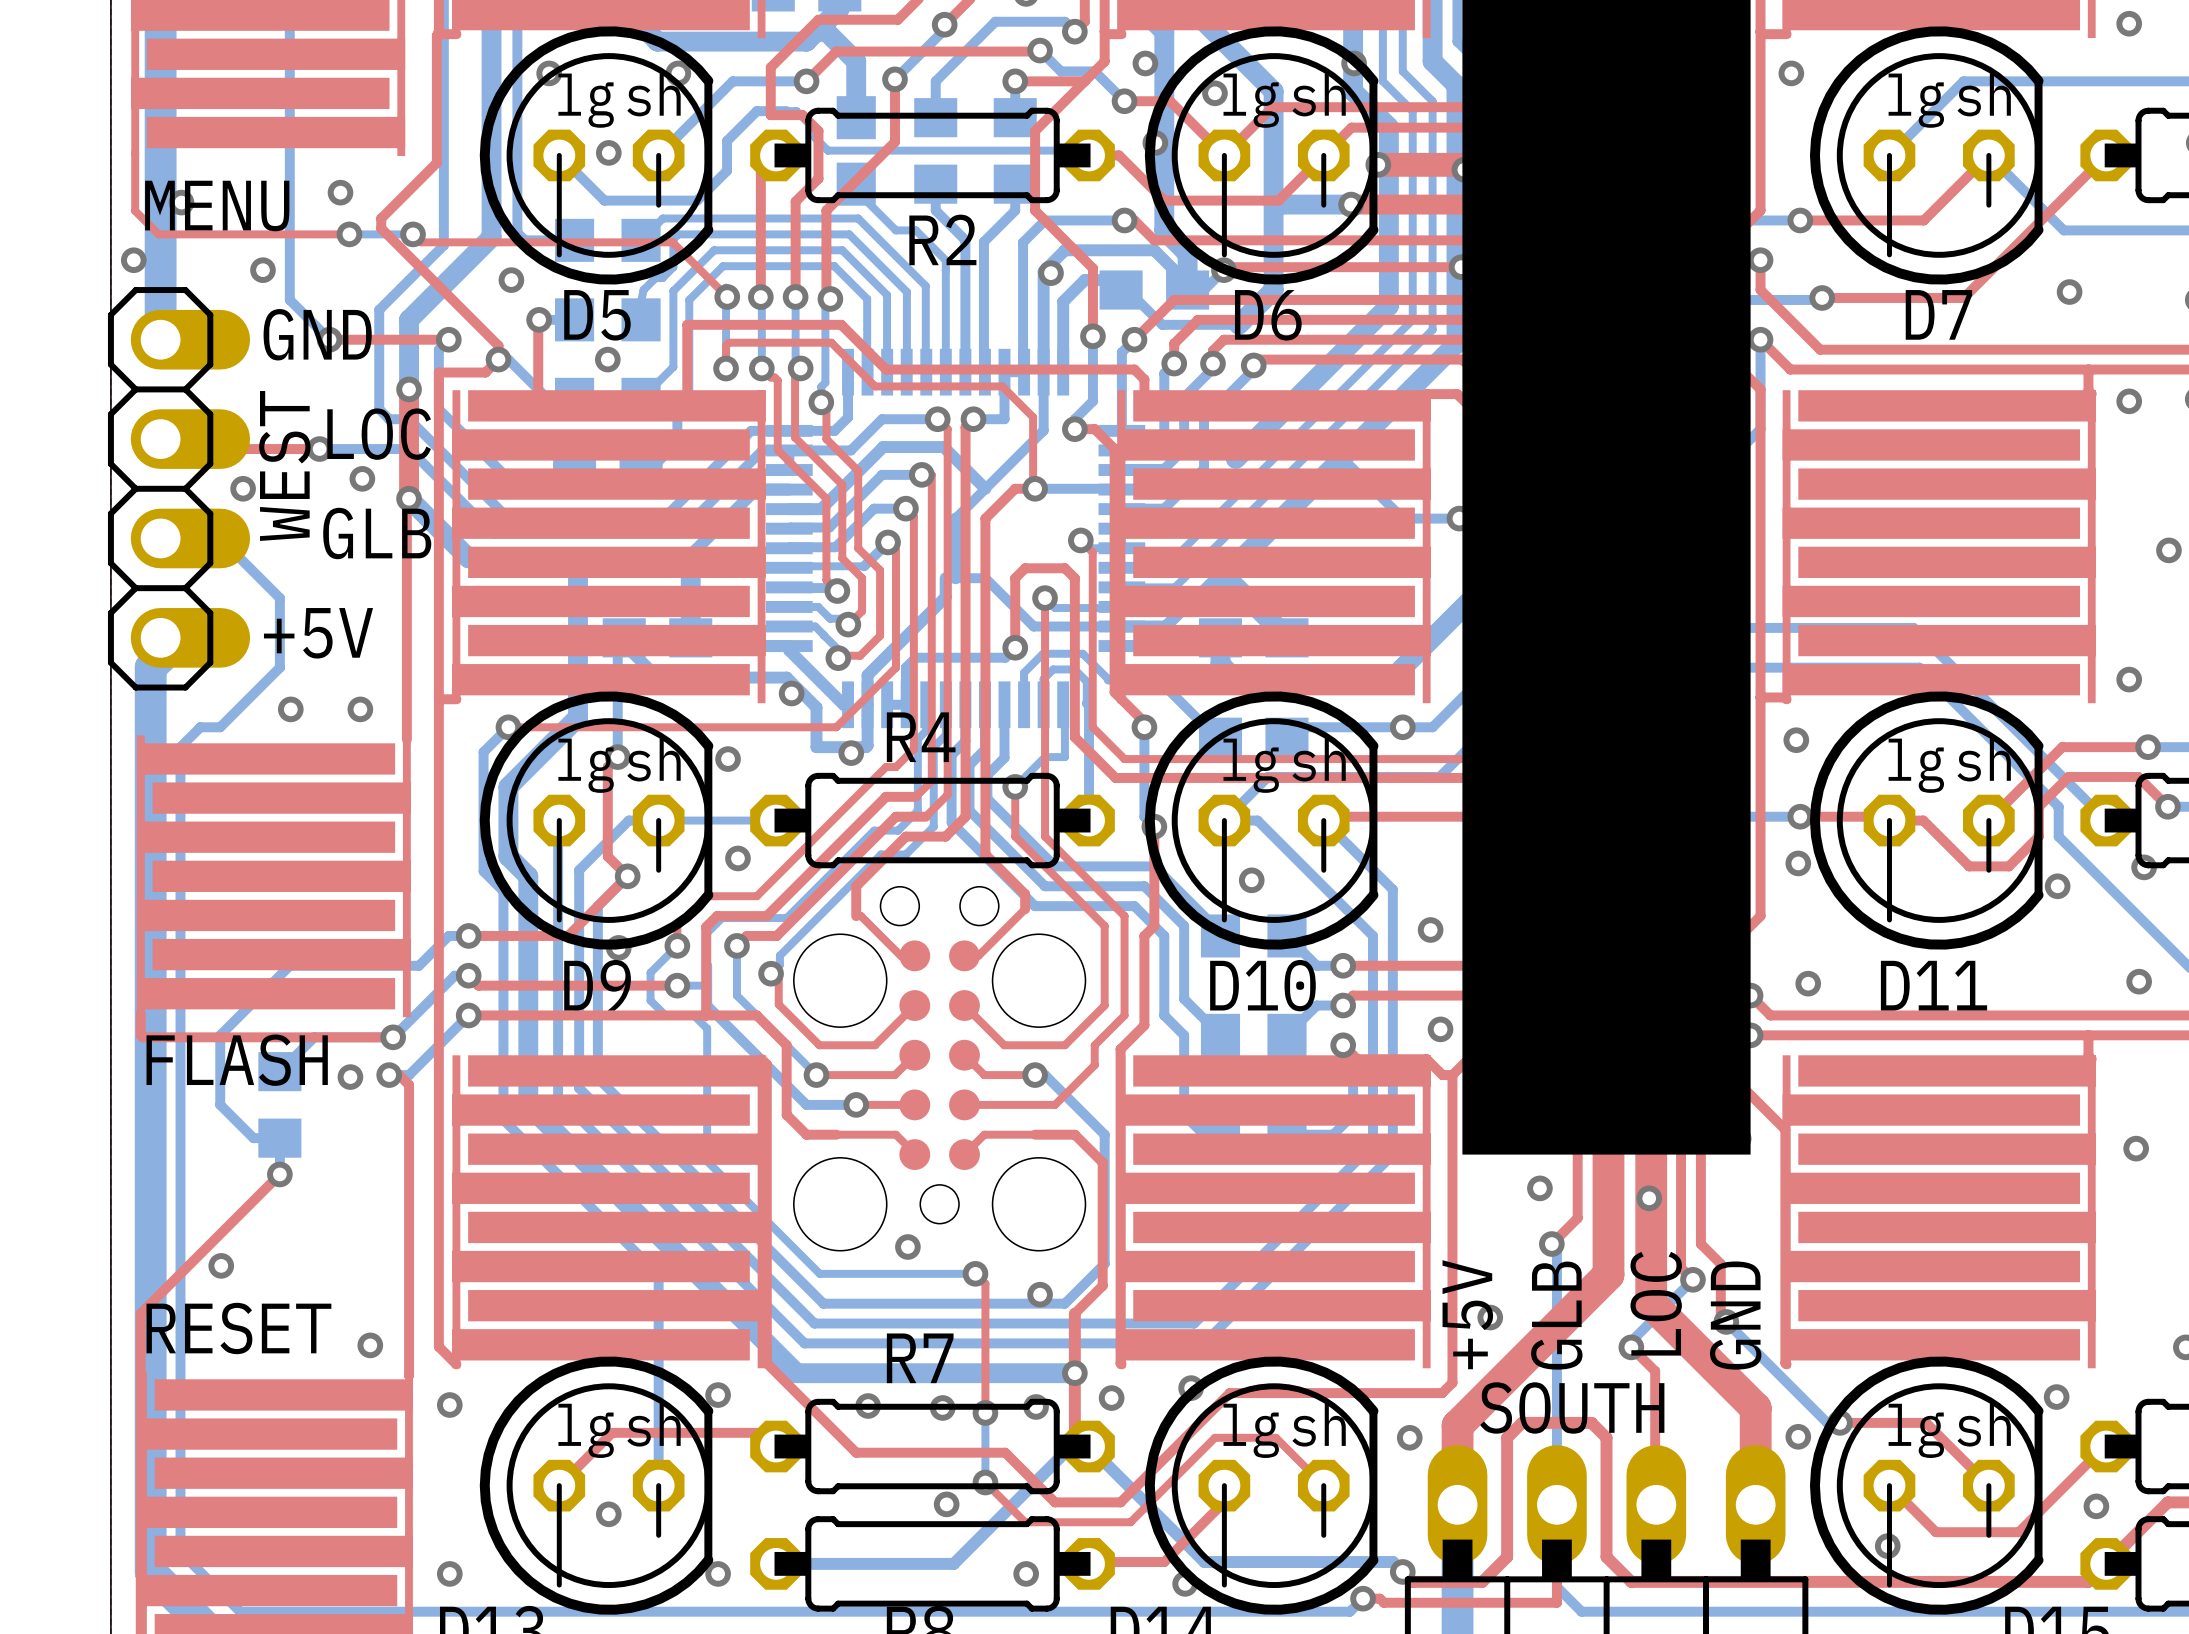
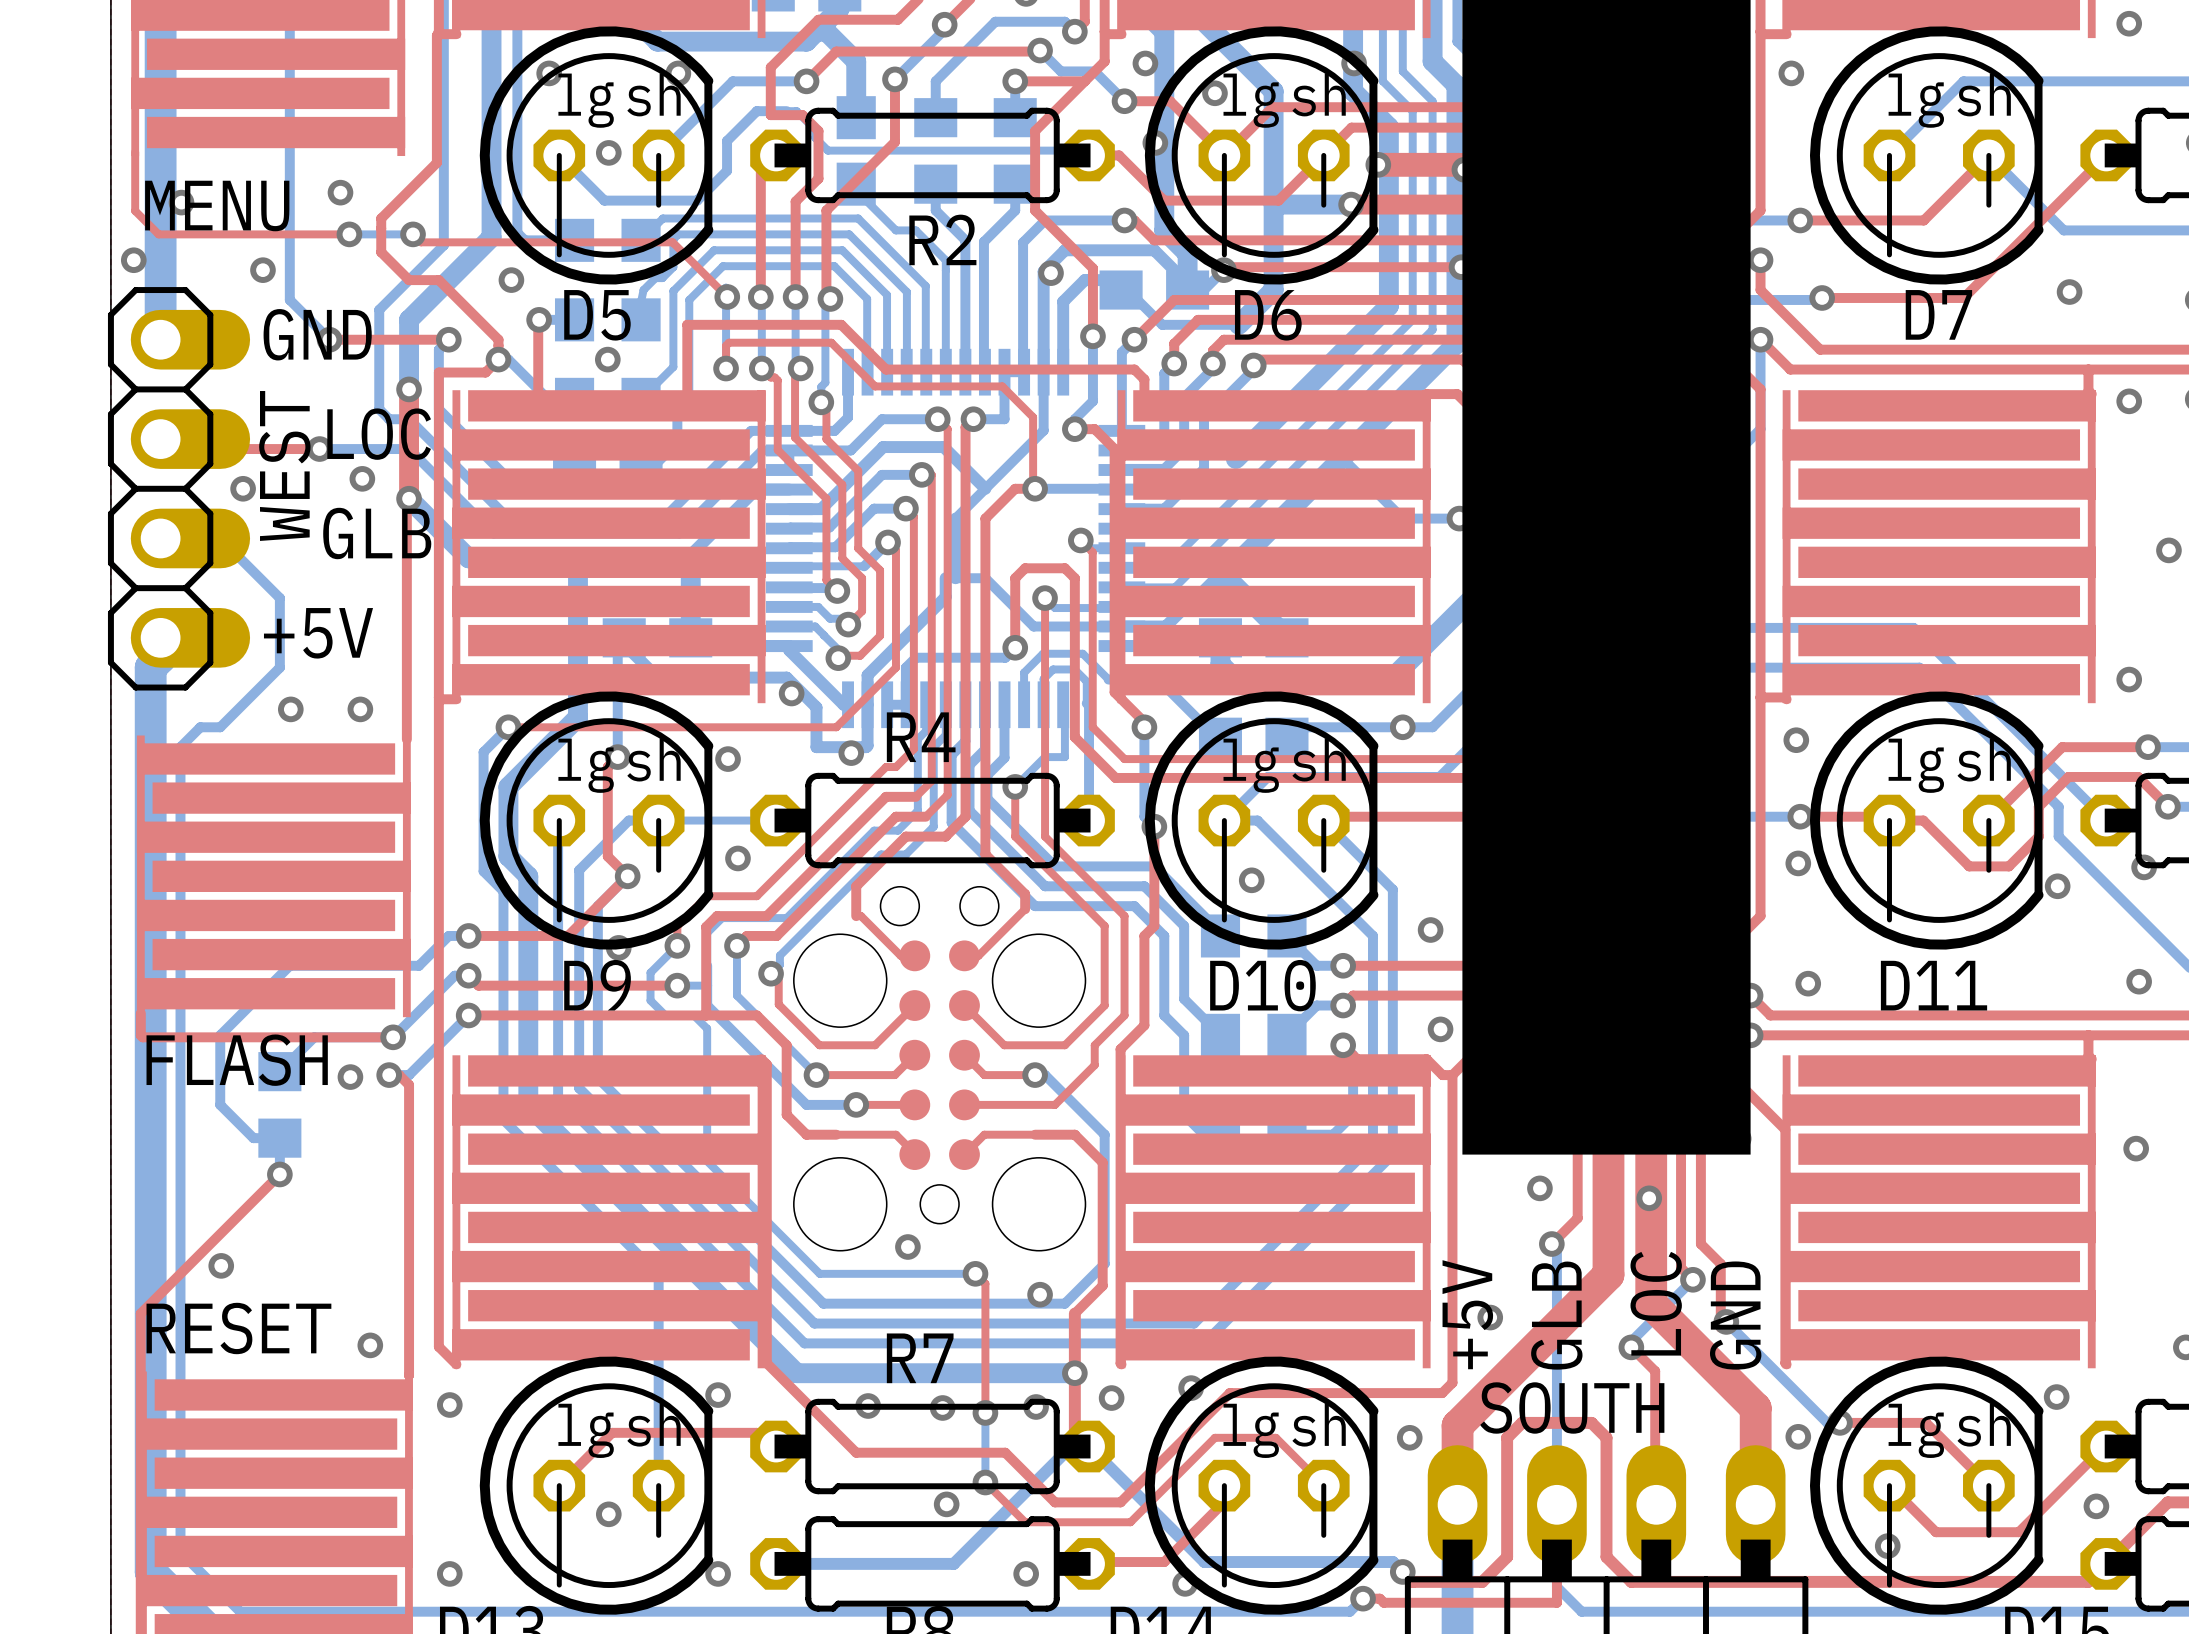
top track: (381, 228) (498, 345) -> (381, 228) (381, 252) (409, 280) (438, 280) (498, 339) (498, 345)

